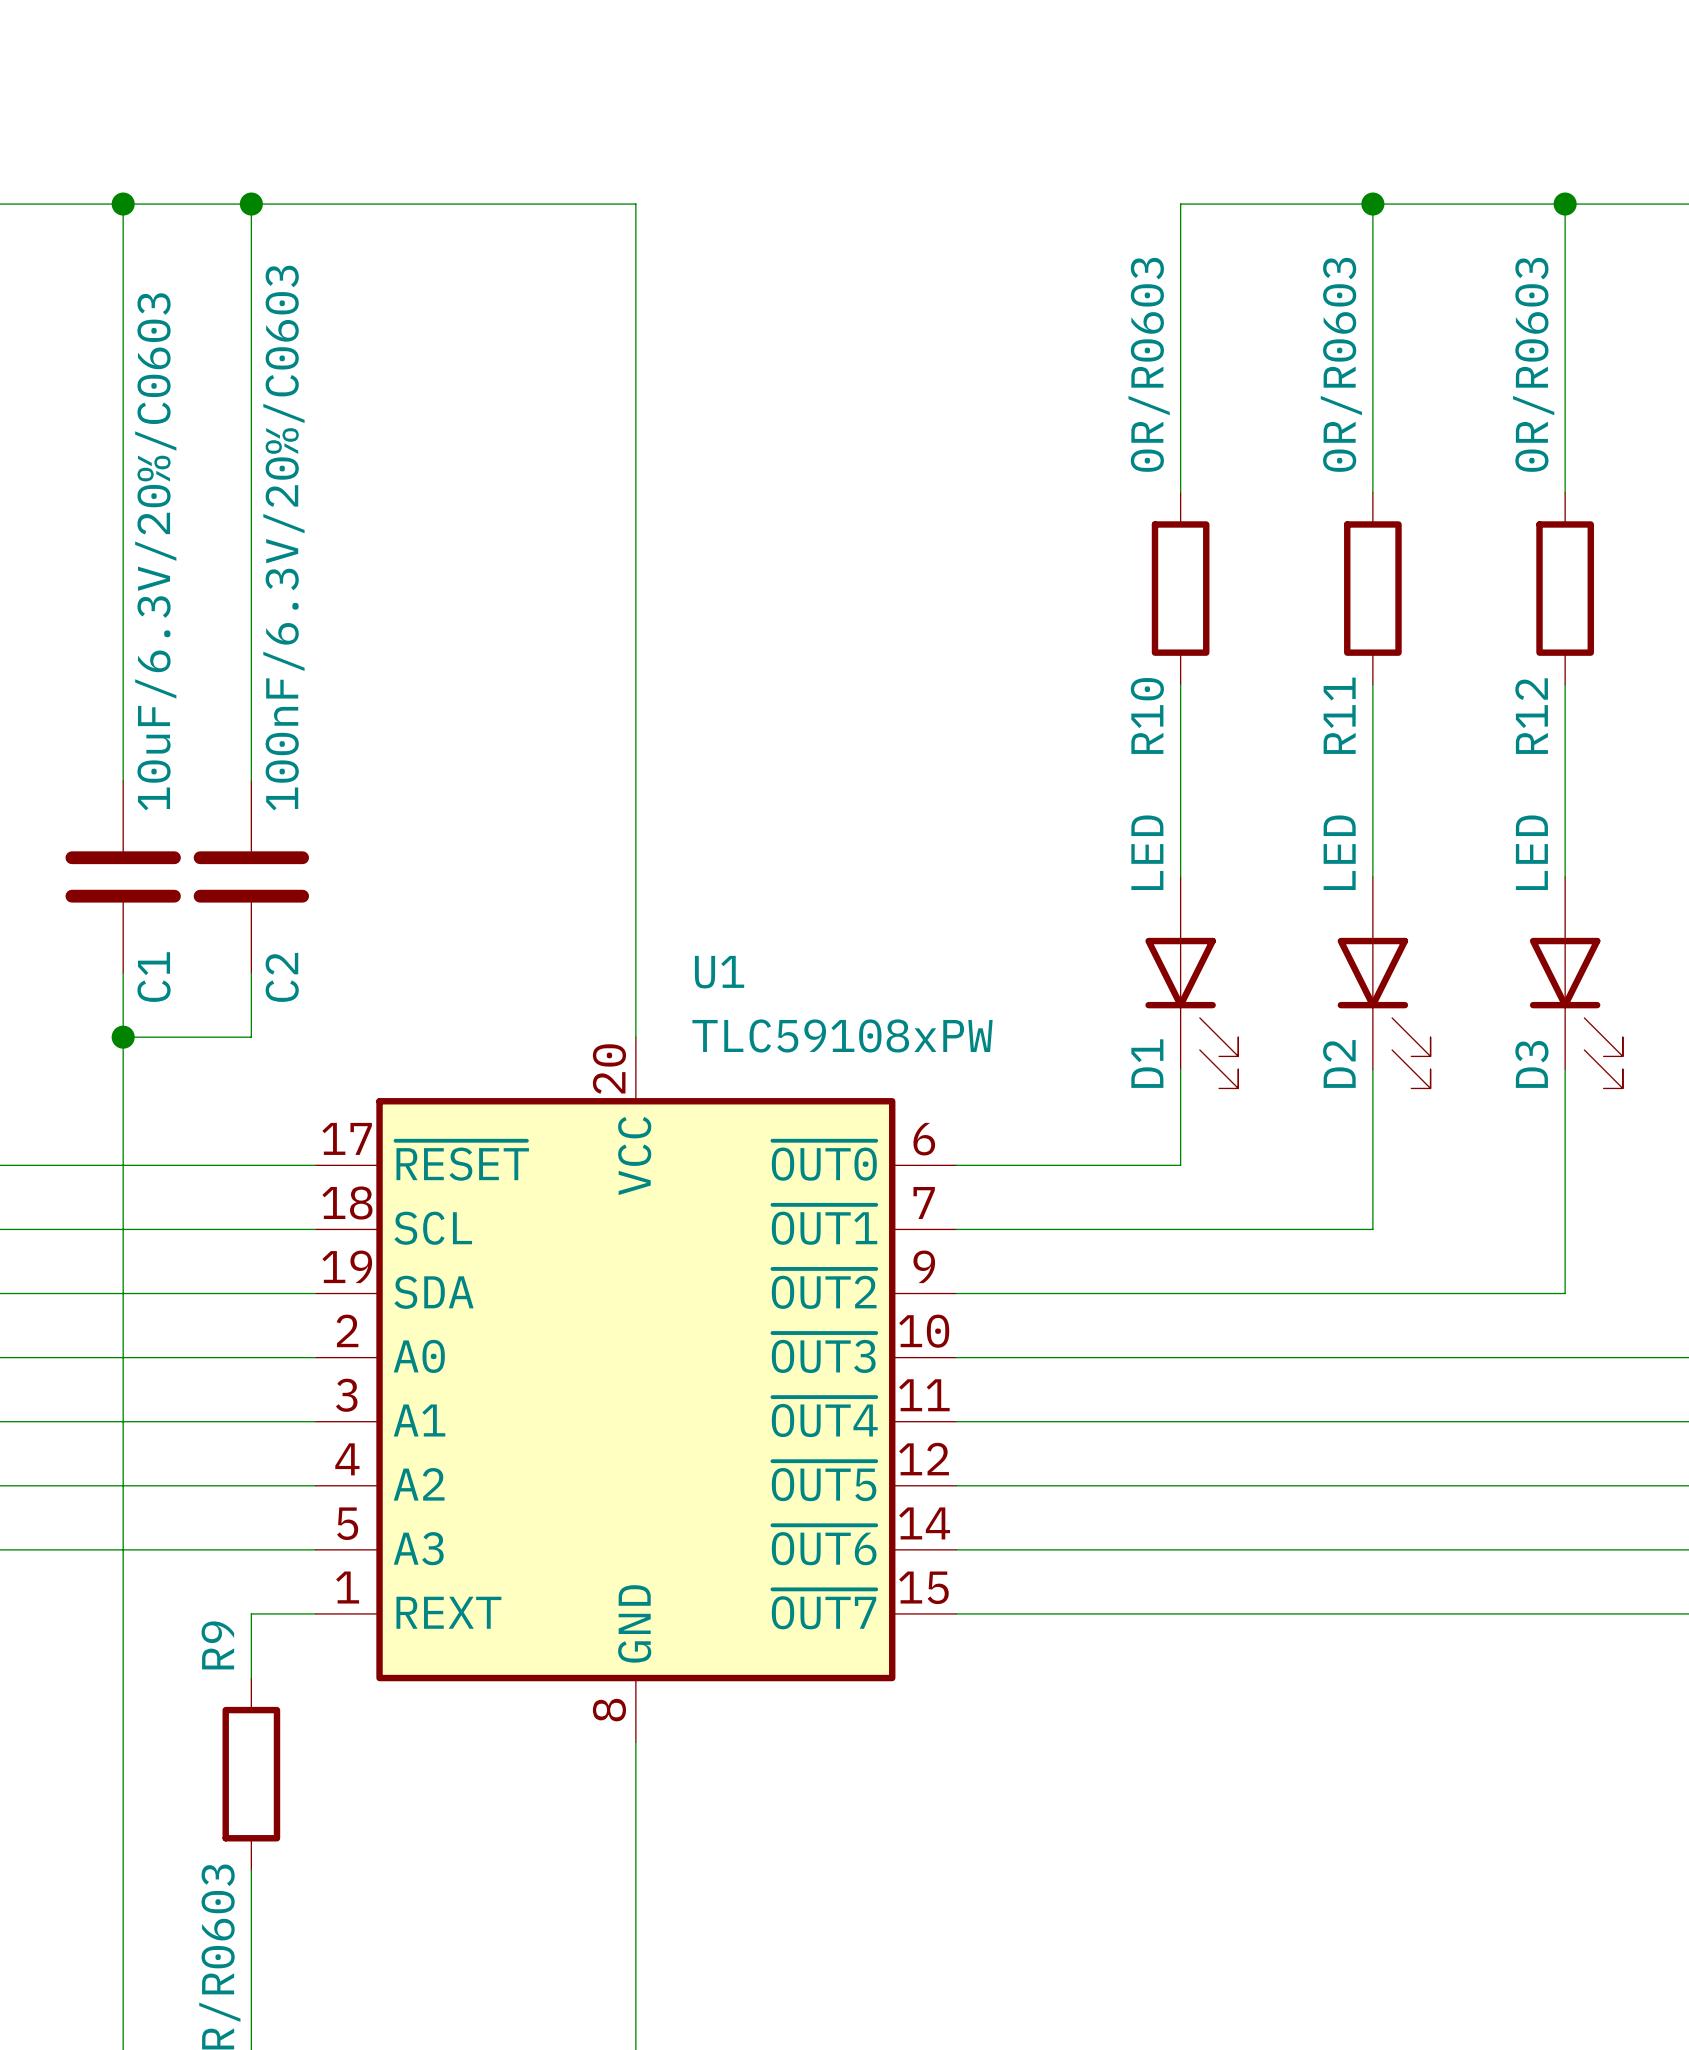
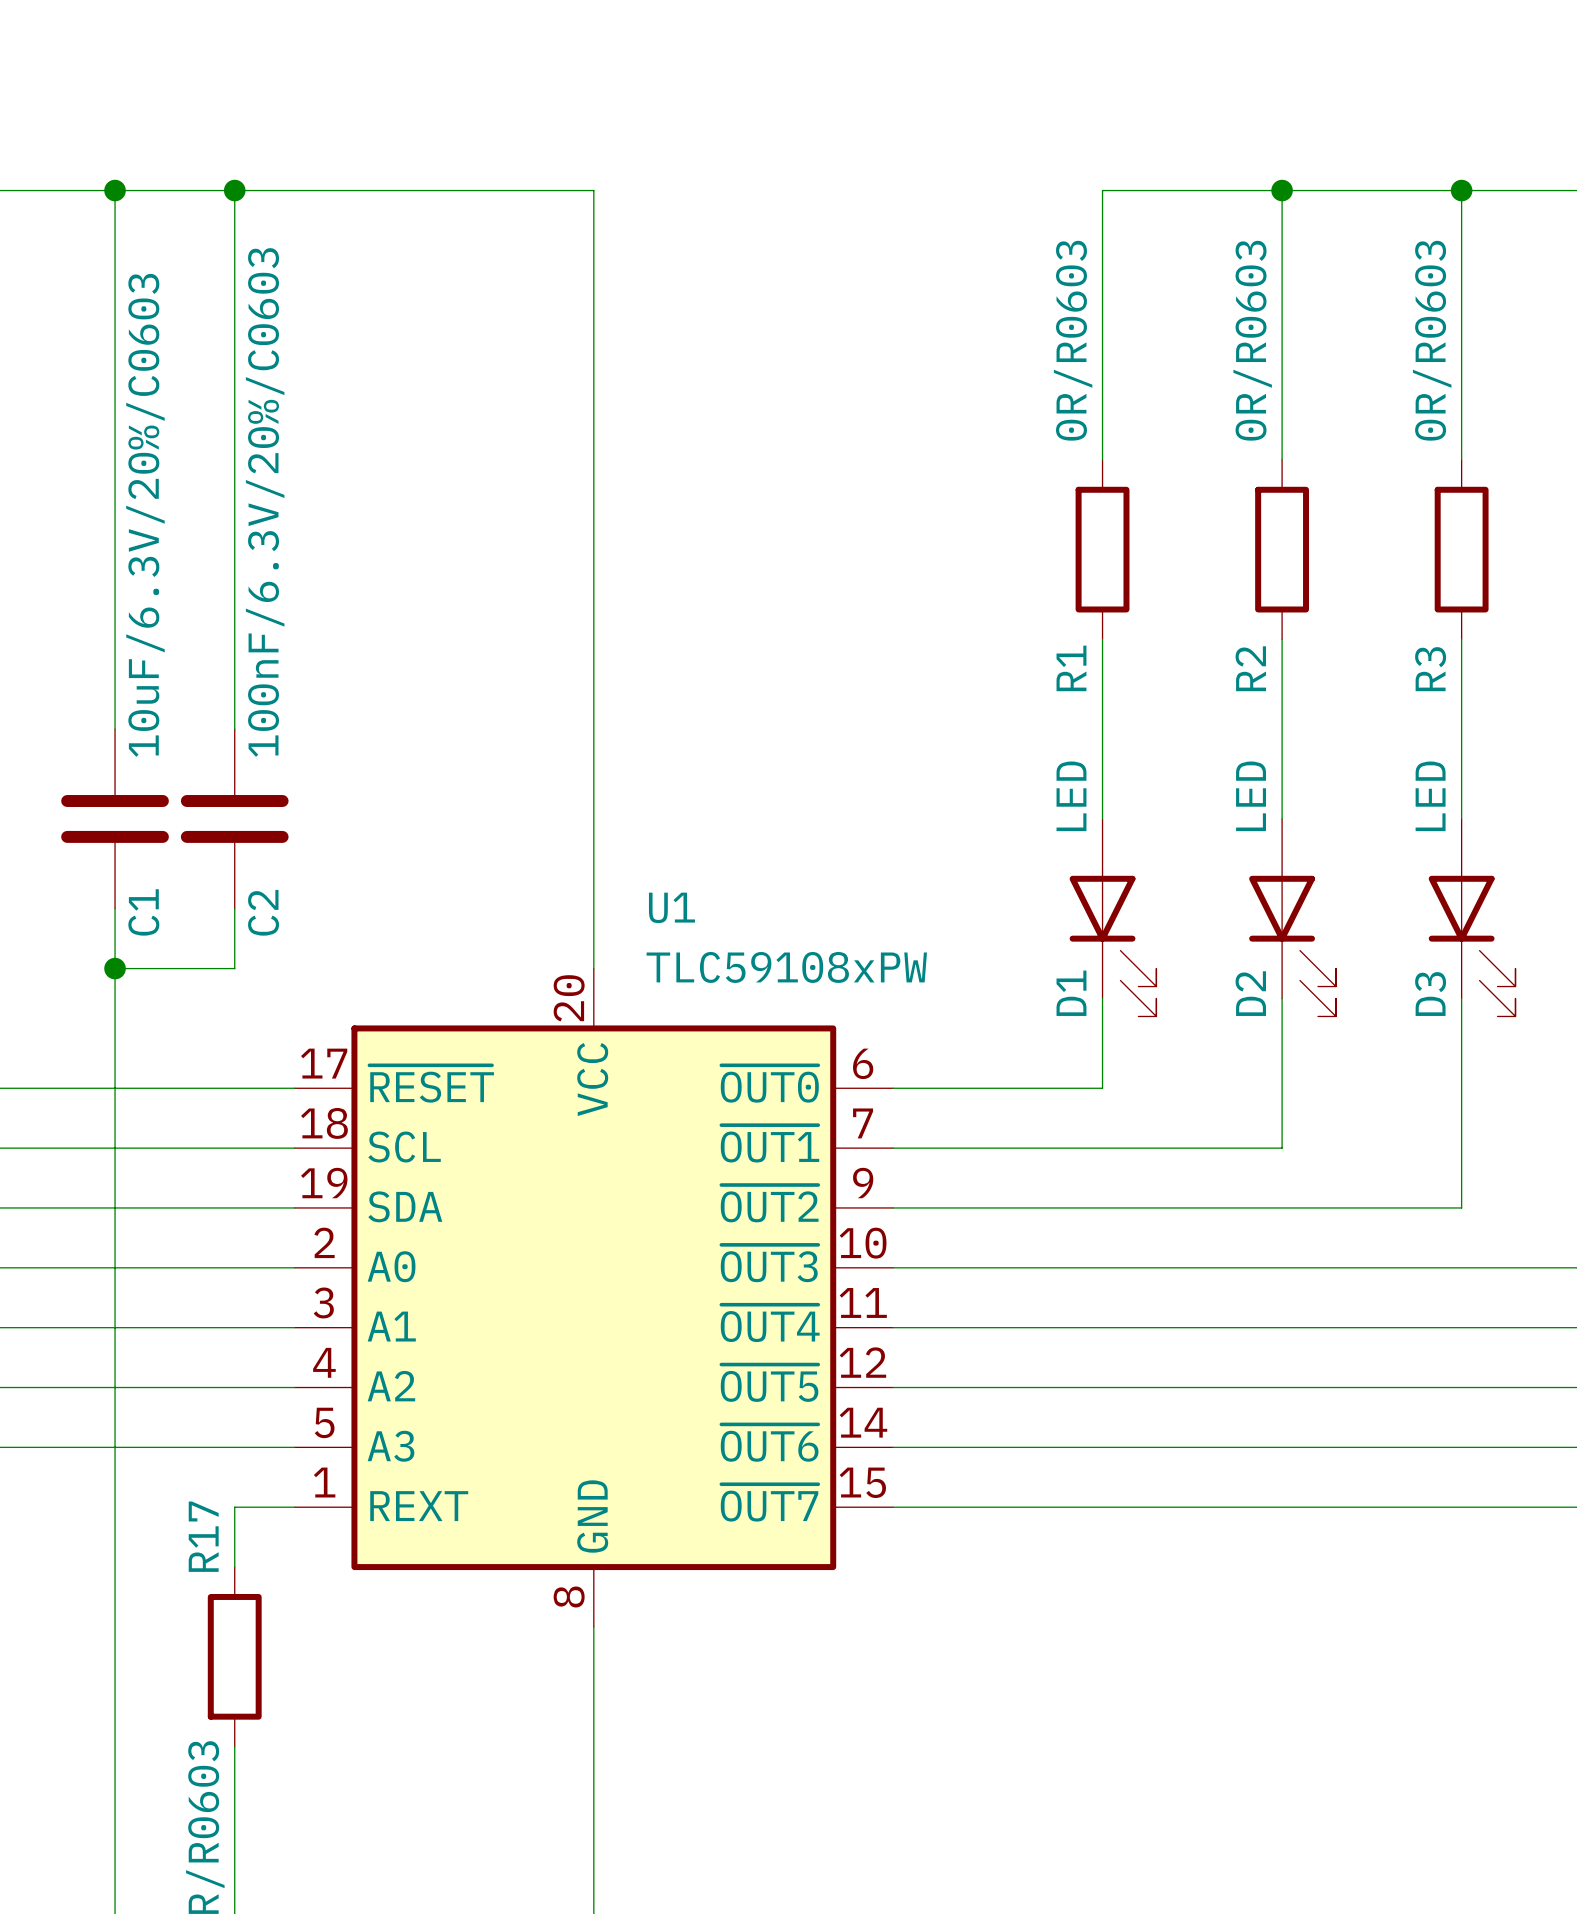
R10 name: R10 (1147, 715) -> R1 (1071, 668)
R11 name: R11 (1339, 715) -> R2 (1250, 668)
R12 name: R12 (1531, 716) -> R3 (1430, 669)
R9 name: R9 (217, 1645) -> R17 (203, 1536)

